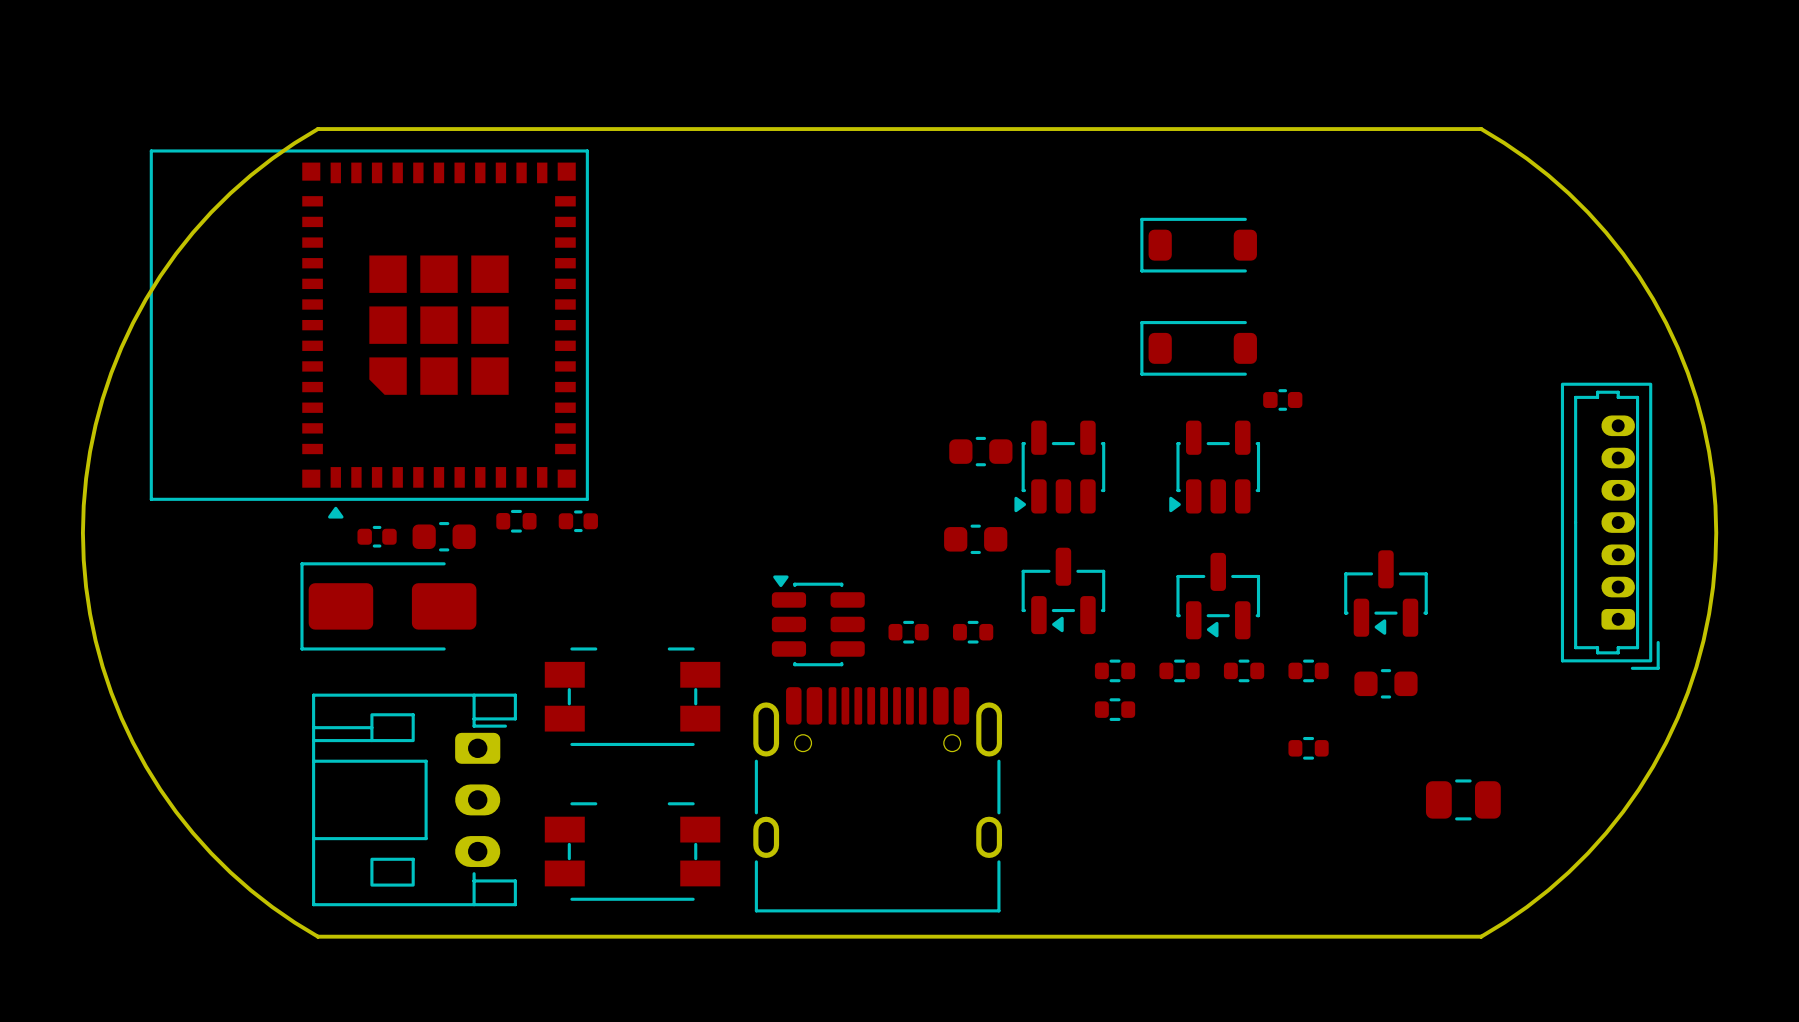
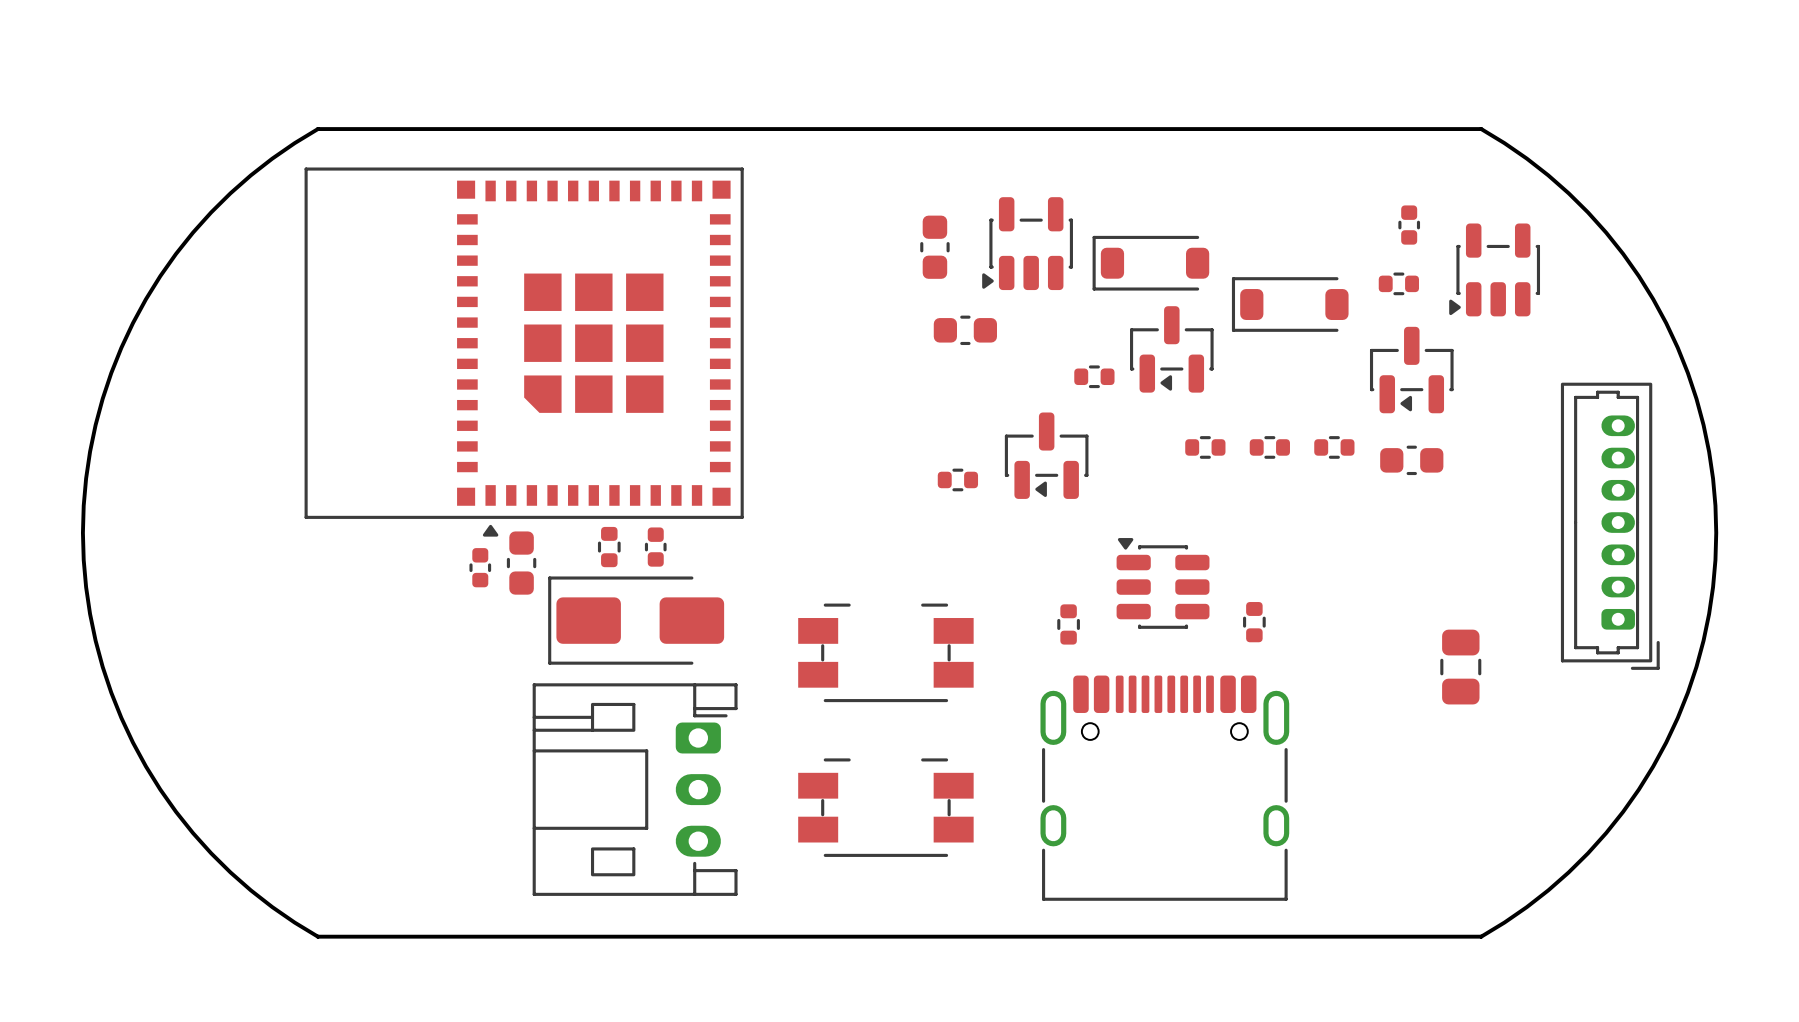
part: none -> (1027, 243)
part: (1198, 245) -> none
part: none -> (934, 247)
part: none -> (1150, 263)
part: none -> (1494, 269)
part: none -> (1398, 283)
part: none -> (1290, 304)
part: none -> (965, 330)
part position: (369, 334) -> (524, 352)
part: (1198, 348) -> none
part: none -> (1171, 349)
part: none -> (1411, 370)
part: none -> (1094, 376)
part rotation: 0° (1282, 399) -> 90° clockwise (1409, 225)
part position: (1282, 399) -> (1409, 225)
part footprint: [1014, 420, 1106, 514] -> [1004, 412, 1089, 499]
part footprint: [1169, 420, 1261, 514] -> [1185, 436, 1226, 459]
part: none -> (1269, 447)
part: none -> (1334, 447)
part: (980, 451) -> none
part: none -> (1411, 460)
part: none -> (957, 479)
part rotation: 0° (516, 521) -> 90° clockwise (609, 547)
part position: (516, 521) -> (609, 547)
part: (578, 521) -> none
part: (377, 536) -> none
part rotation: 0° (444, 536) -> 90° clockwise (521, 563)
part position: (444, 536) -> (521, 563)
part: (975, 539) -> none
part: none -> (655, 547)
part: none -> (480, 567)
part: (1063, 590) -> none
part: (1385, 593) -> none
part: (1218, 596) -> none
part position: (388, 606) -> (636, 620)
part position: (818, 620) -> (1163, 583)
part: none -> (1254, 622)
part: none -> (1068, 624)
part: (908, 632) -> none
part: (973, 632) -> none
part: none -> (885, 652)
part: (1115, 670) -> none
part: (1179, 670) -> none
part: (1244, 670) -> none
part: (1308, 670) -> none
part: (1385, 683) -> none
part footprint: [753, 687, 1003, 913] -> [798, 758, 974, 857]
part: (632, 696) -> none
part: (1115, 709) -> none
part: (1308, 748) -> none
part: none -> (1164, 788)
part position: (414, 799) -> (635, 789)
part rotation: 0° (1463, 799) -> 90° clockwise (1460, 667)
part position: (1463, 799) -> (1460, 667)
part: (632, 851) -> none

